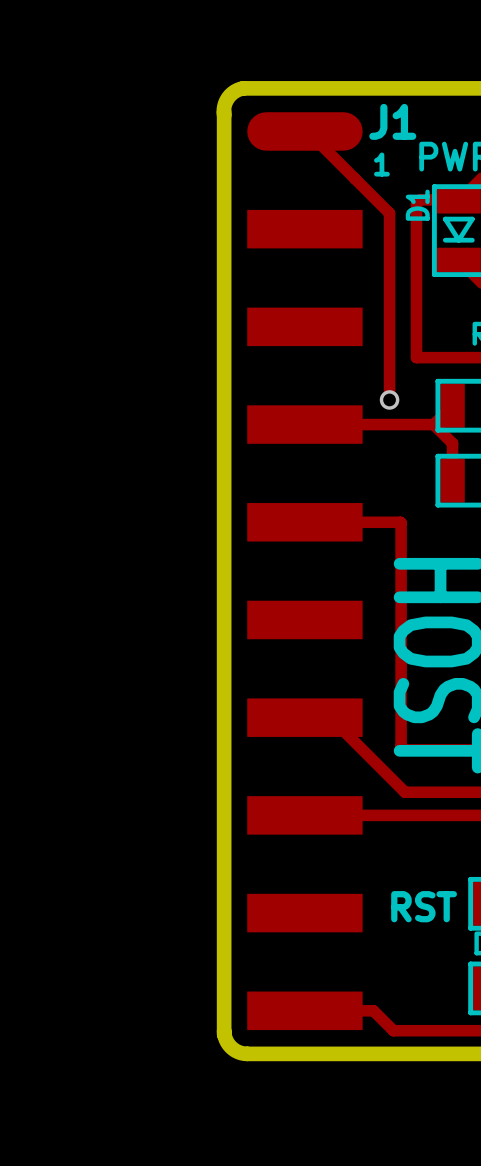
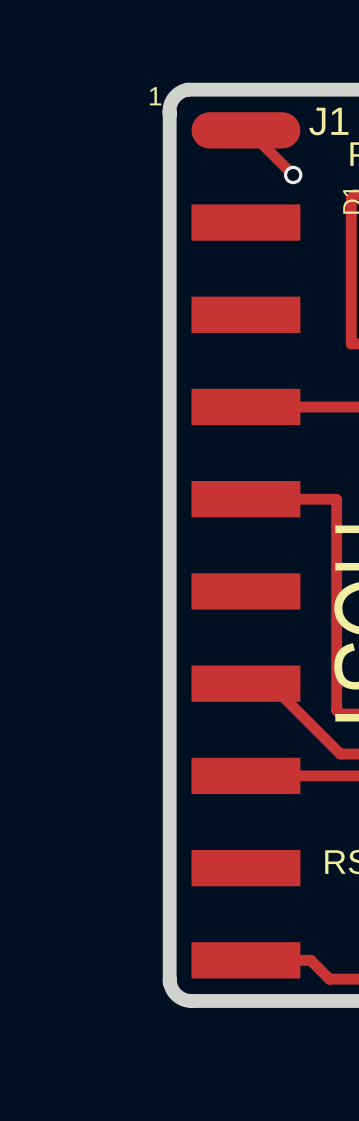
J1 text position: 1 (381, 164) -> 1 (155, 96)
track: (354, 178) (389, 213) (389, 399) -> none
via: none -> (293, 174)
via: (389, 399) -> none

